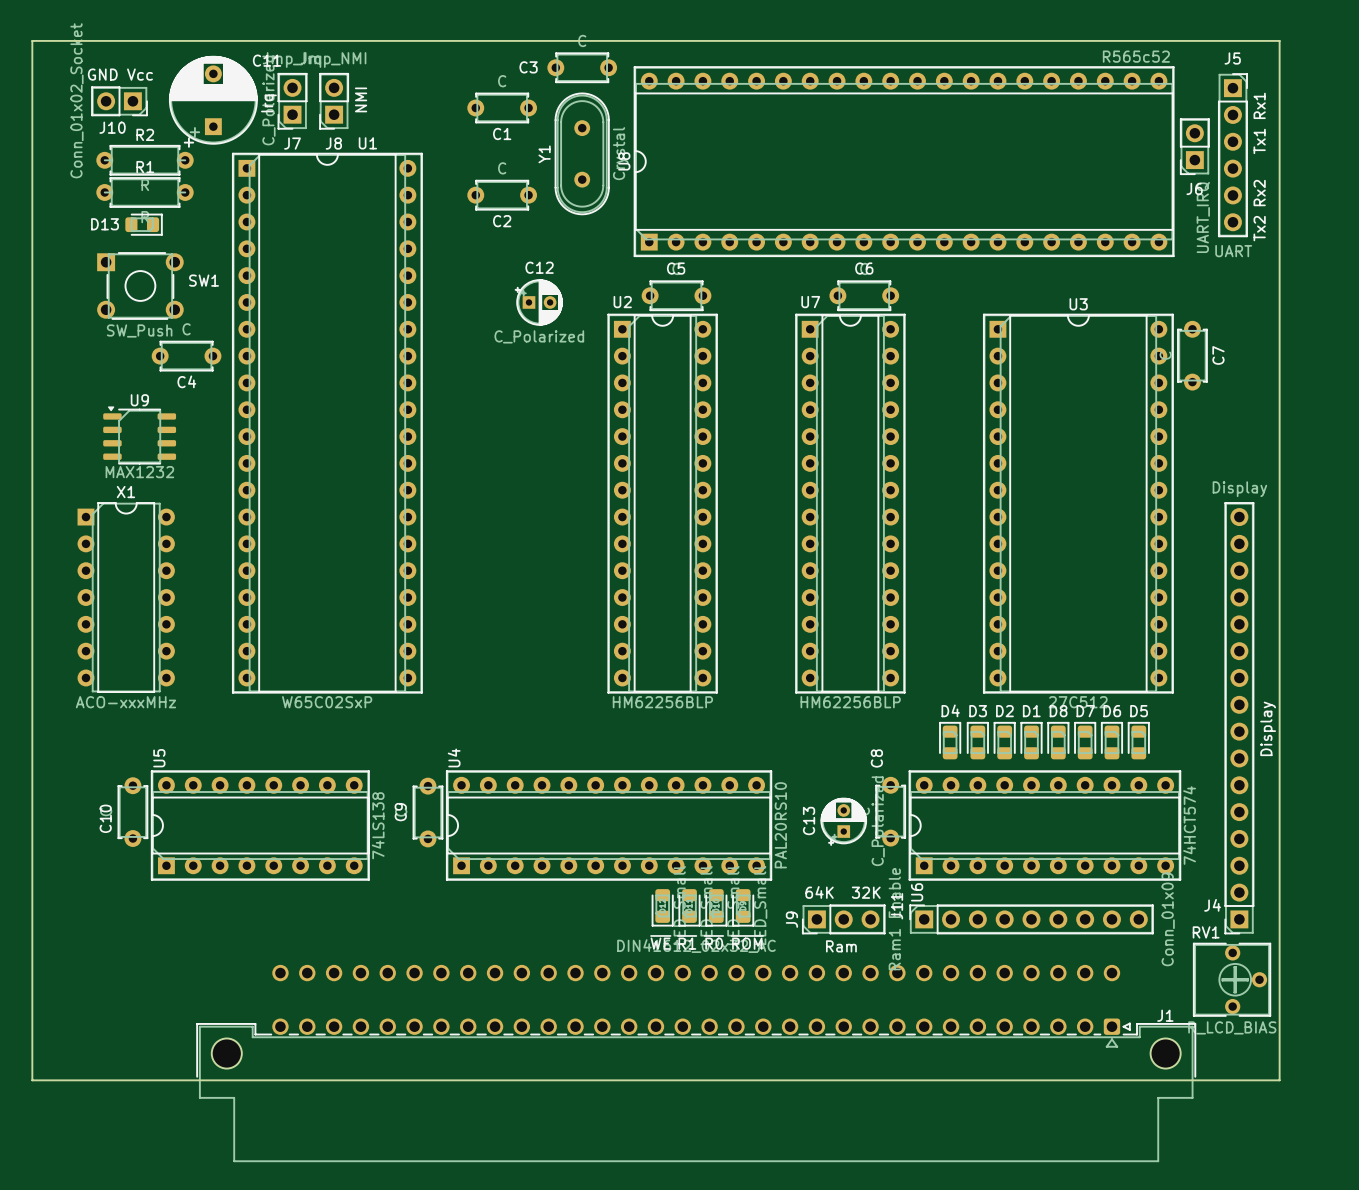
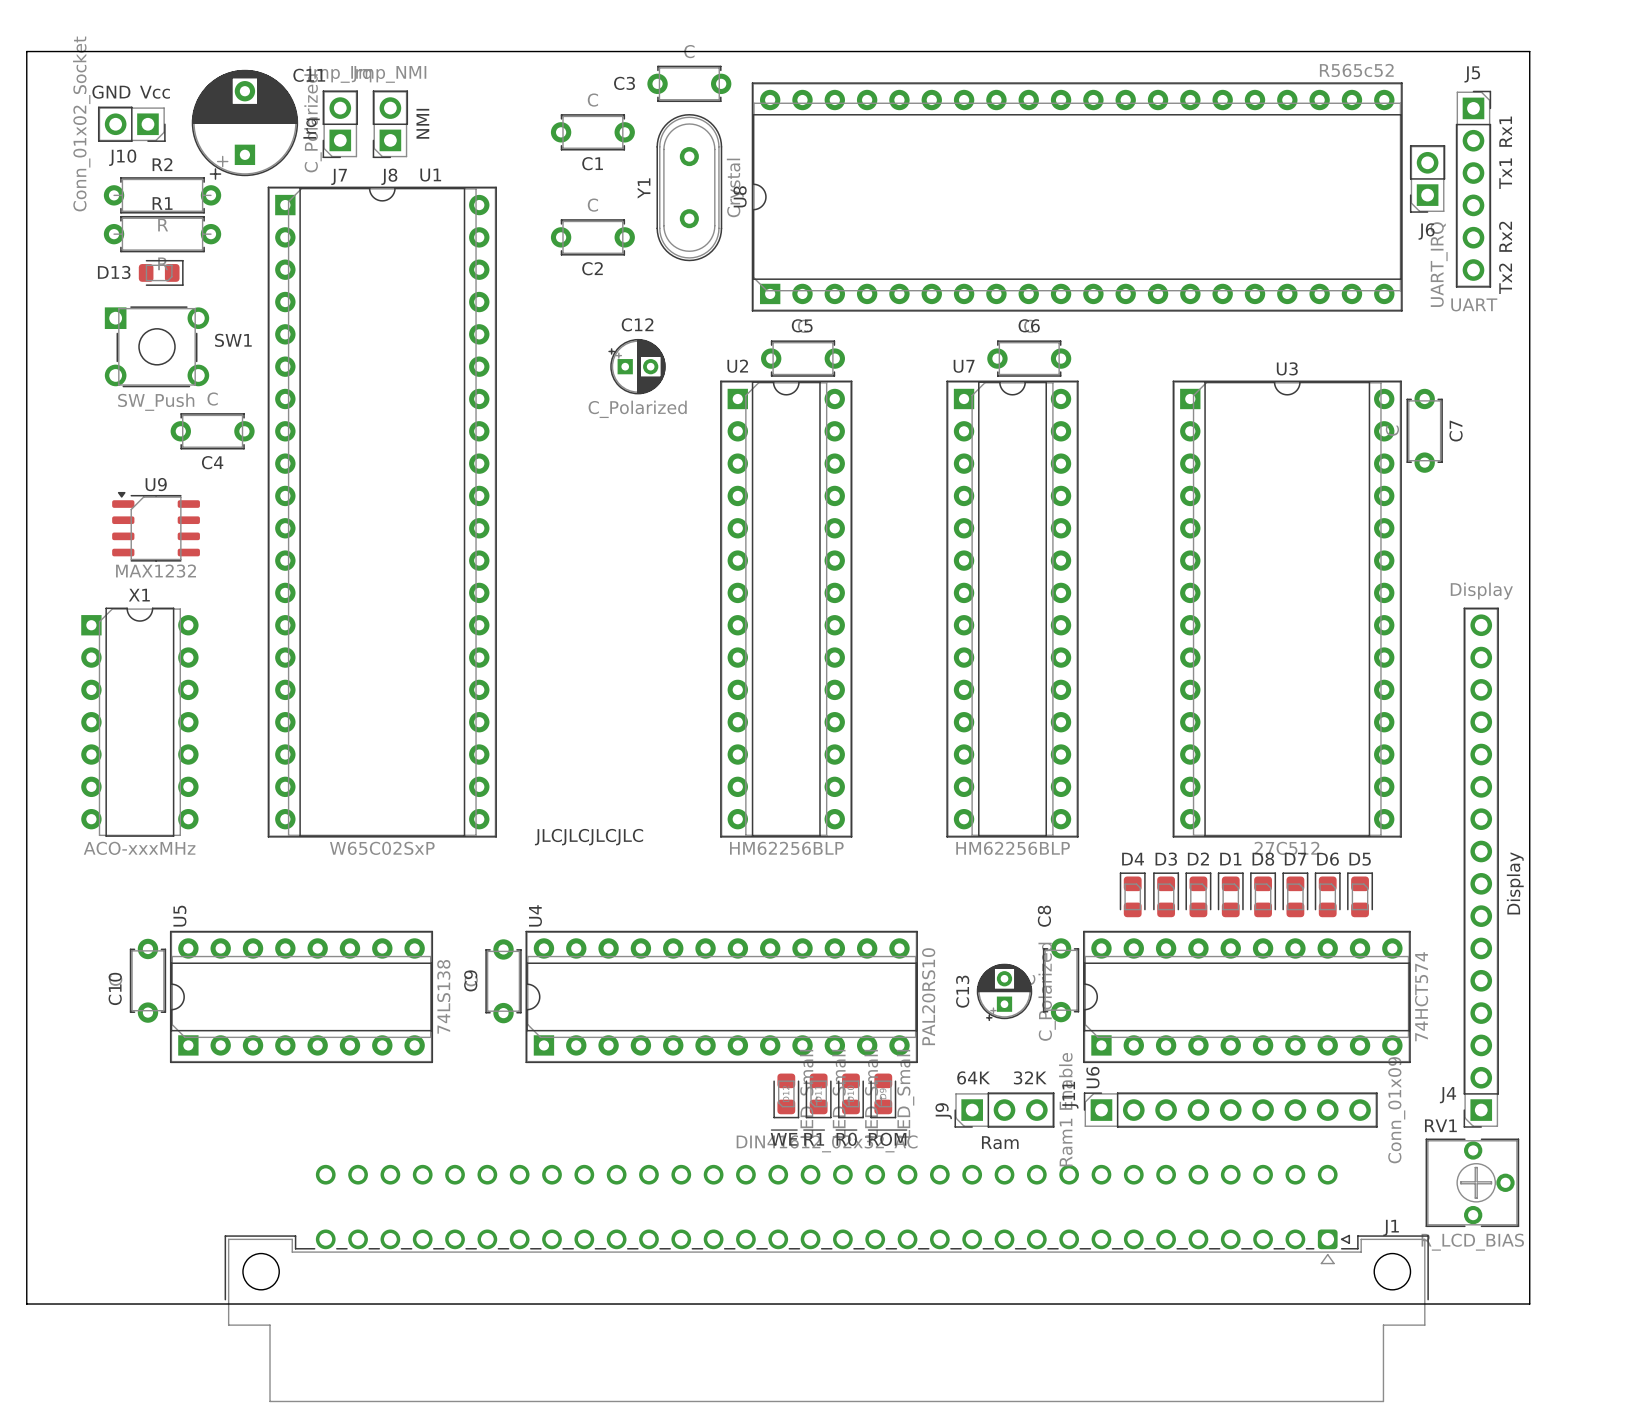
text: none -> JLCJLCJLCJLC (589, 837)

